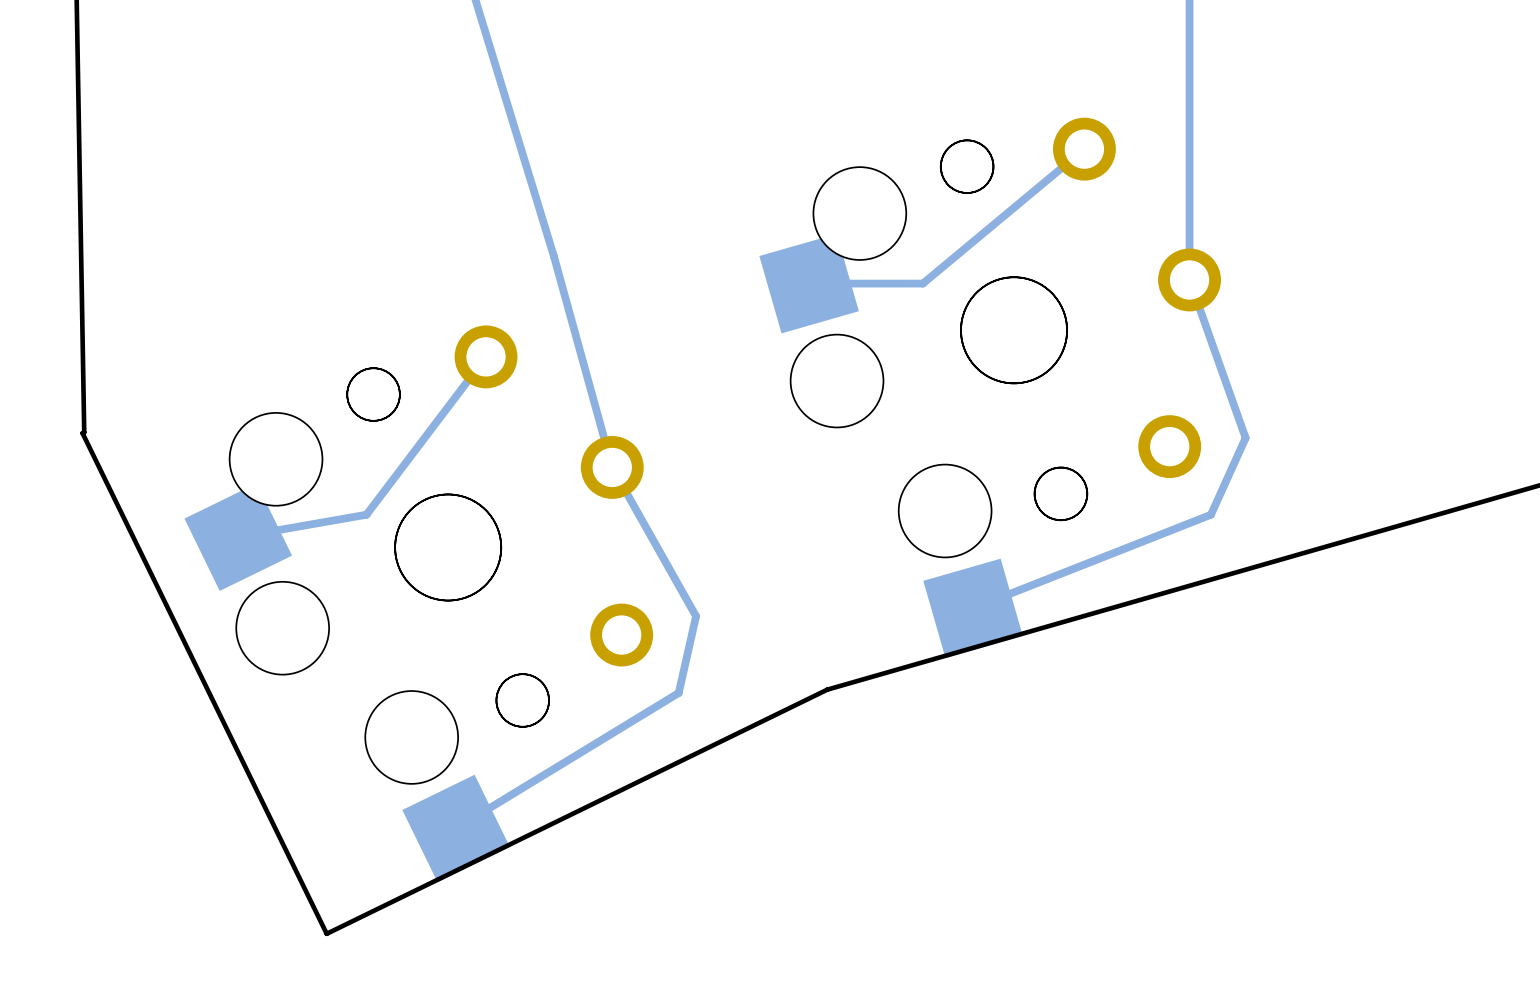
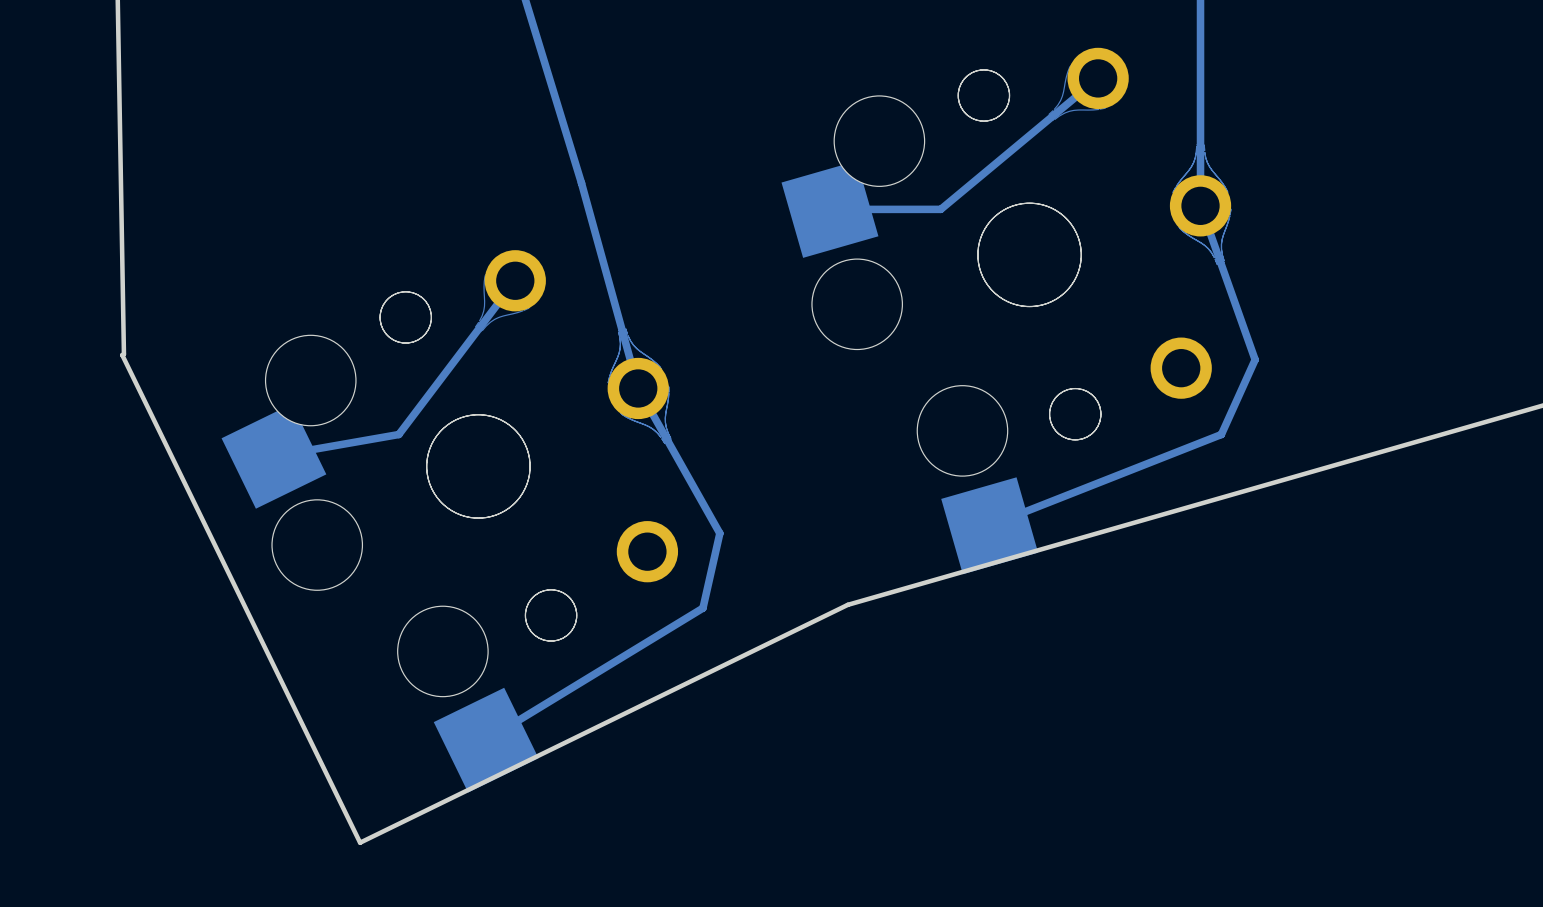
zone outline: none -> (1070, 65) (1060, 100) (1048, 114) (1053, 120) (1069, 111) (1105, 108) (1109, 68) (1070, 65)
zone outline: none -> (1204, 144) (1207, 162) (1228, 192) (1200, 221) (1172, 192) (1193, 162) (1196, 144) (1204, 144)
zone outline: none -> (1195, 191) (1179, 227) (1208, 248) (1217, 264) (1224, 262) (1221, 244) (1230, 209) (1195, 191)
zone outline: none -> (524, 268) (485, 274) (483, 310) (475, 327) (481, 331) (494, 319) (529, 308) (524, 268)
zone outline: none -> (625, 328) (633, 345) (661, 368) (642, 403) (608, 382) (620, 348) (618, 330) (625, 328)
zone outline: none -> (630, 375) (620, 413) (653, 429) (664, 443) (671, 439) (665, 422) (668, 386) (630, 375)

